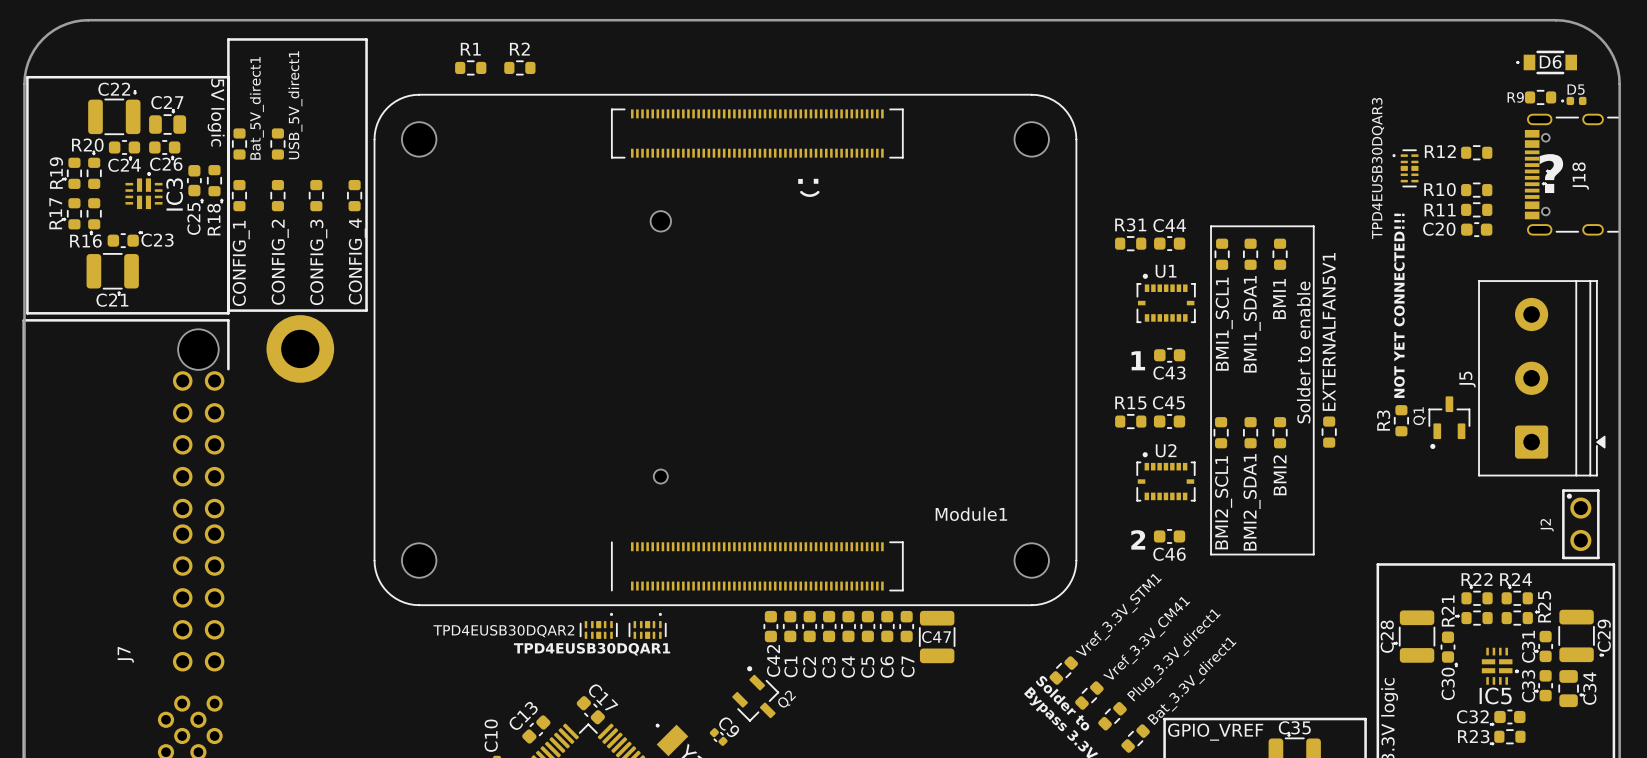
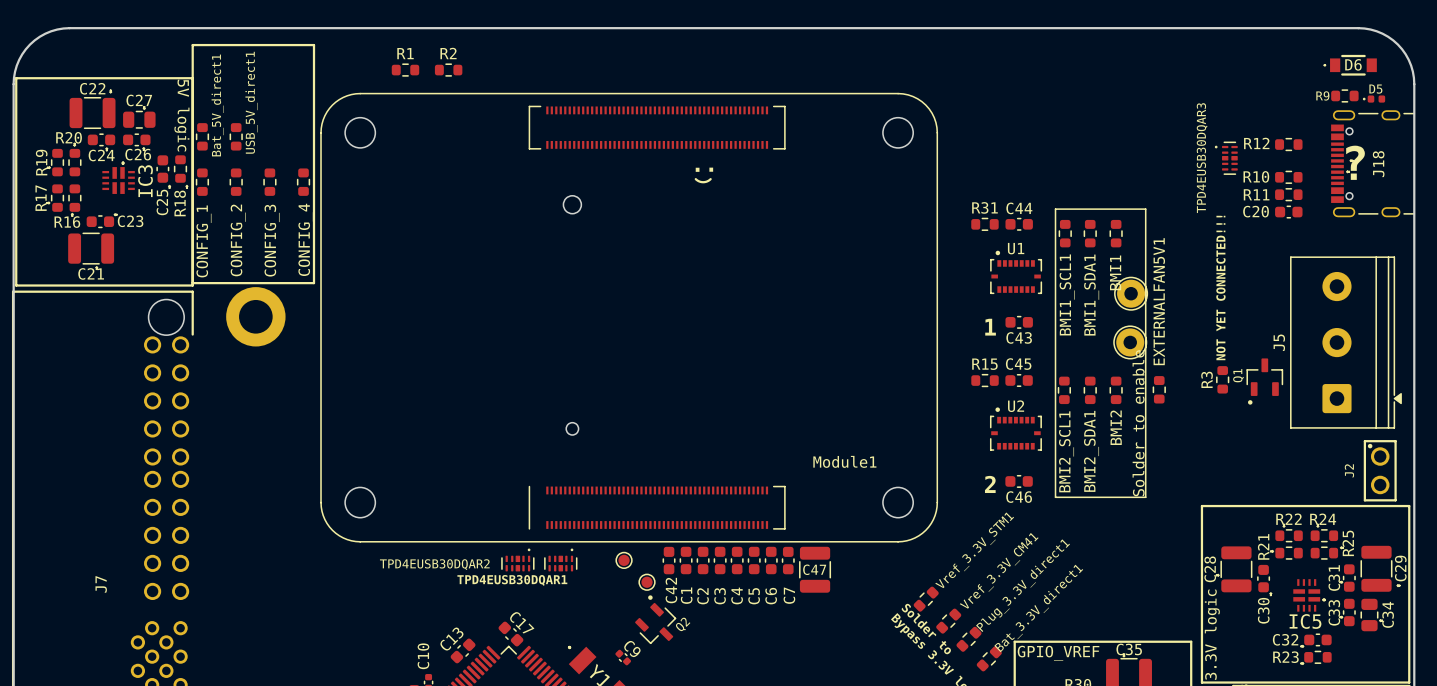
part: none -> (1131, 293)
text position: Solder to enable (1303, 352) -> Solder to enable (1138, 423)
part: none -> (1130, 342)
part: none -> (624, 560)
part: none -> (647, 582)

